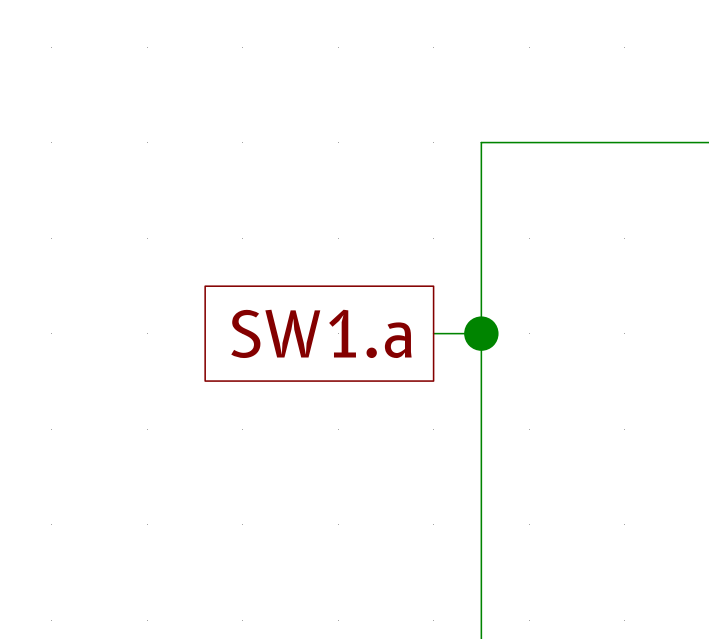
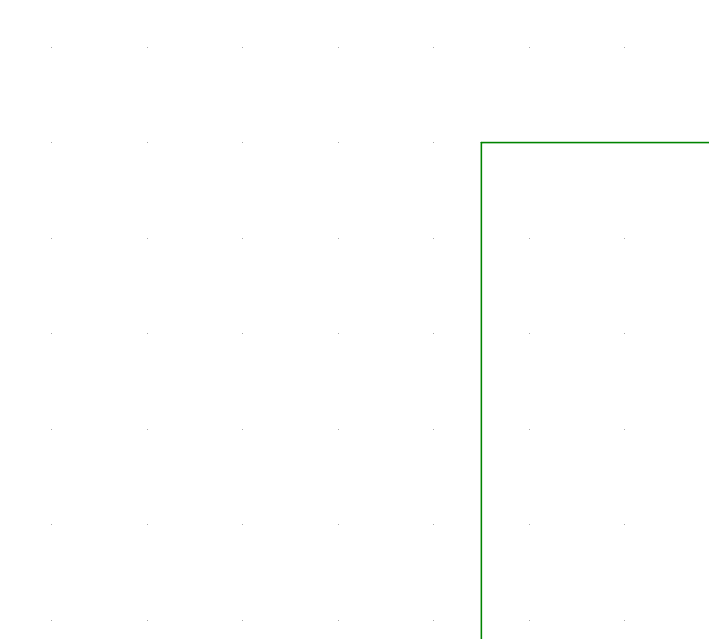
global label: SW1.a (321, 333) -> none
wire: (433, 333) (481, 333) -> none
junction: (481, 333) -> none

